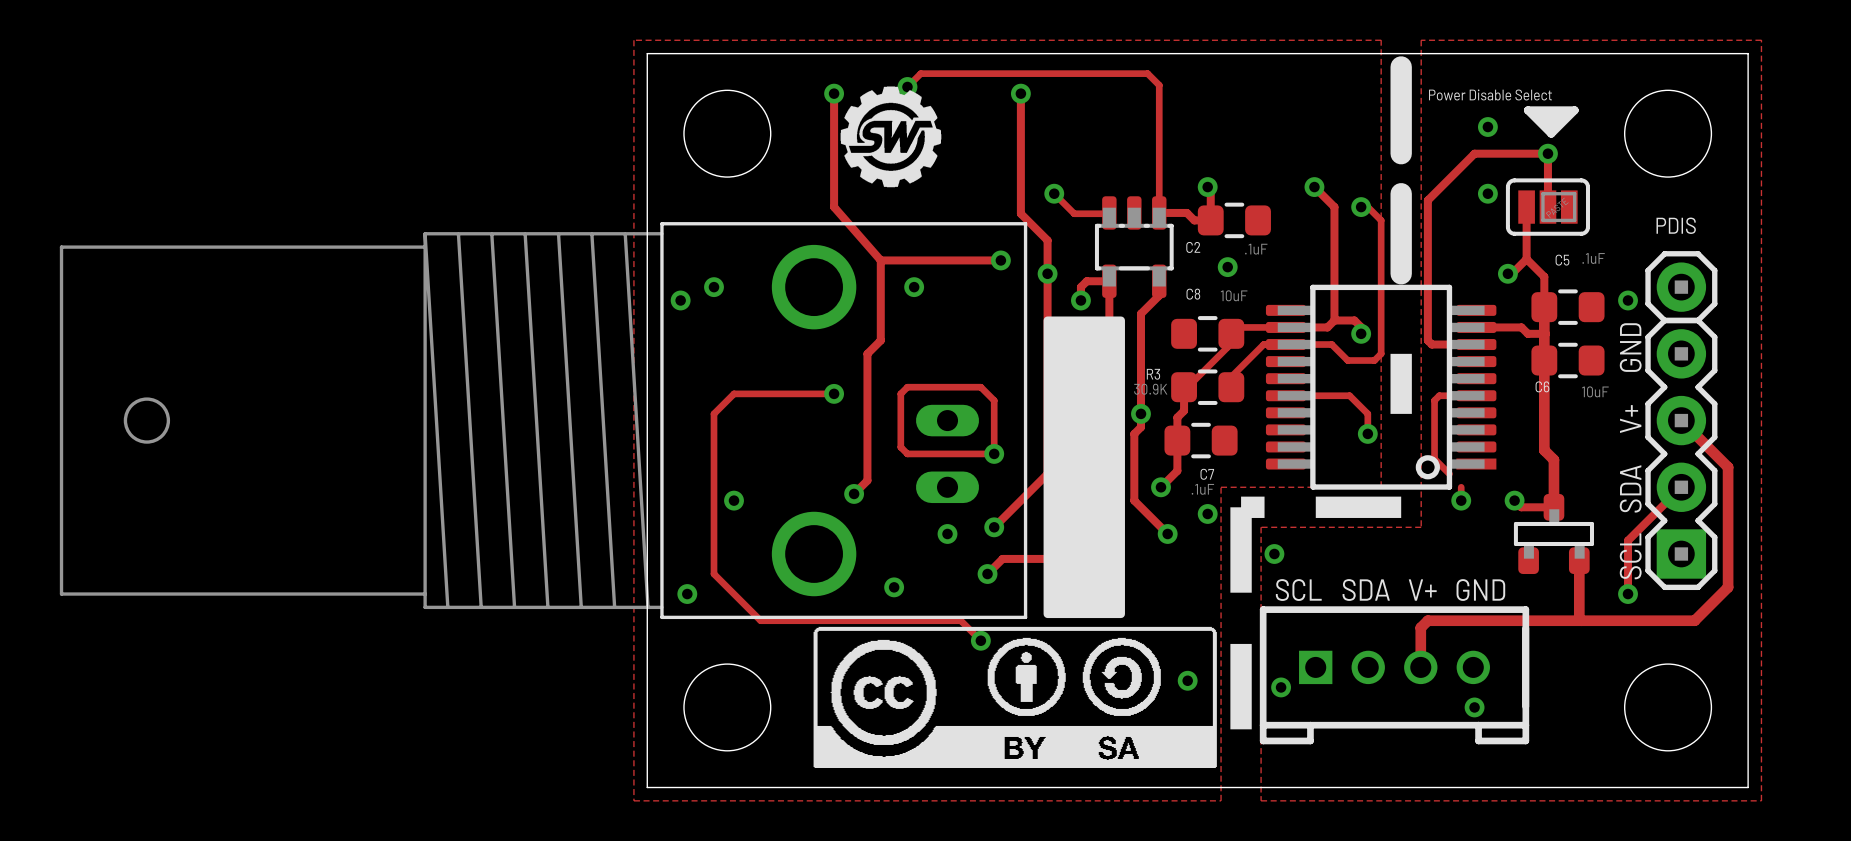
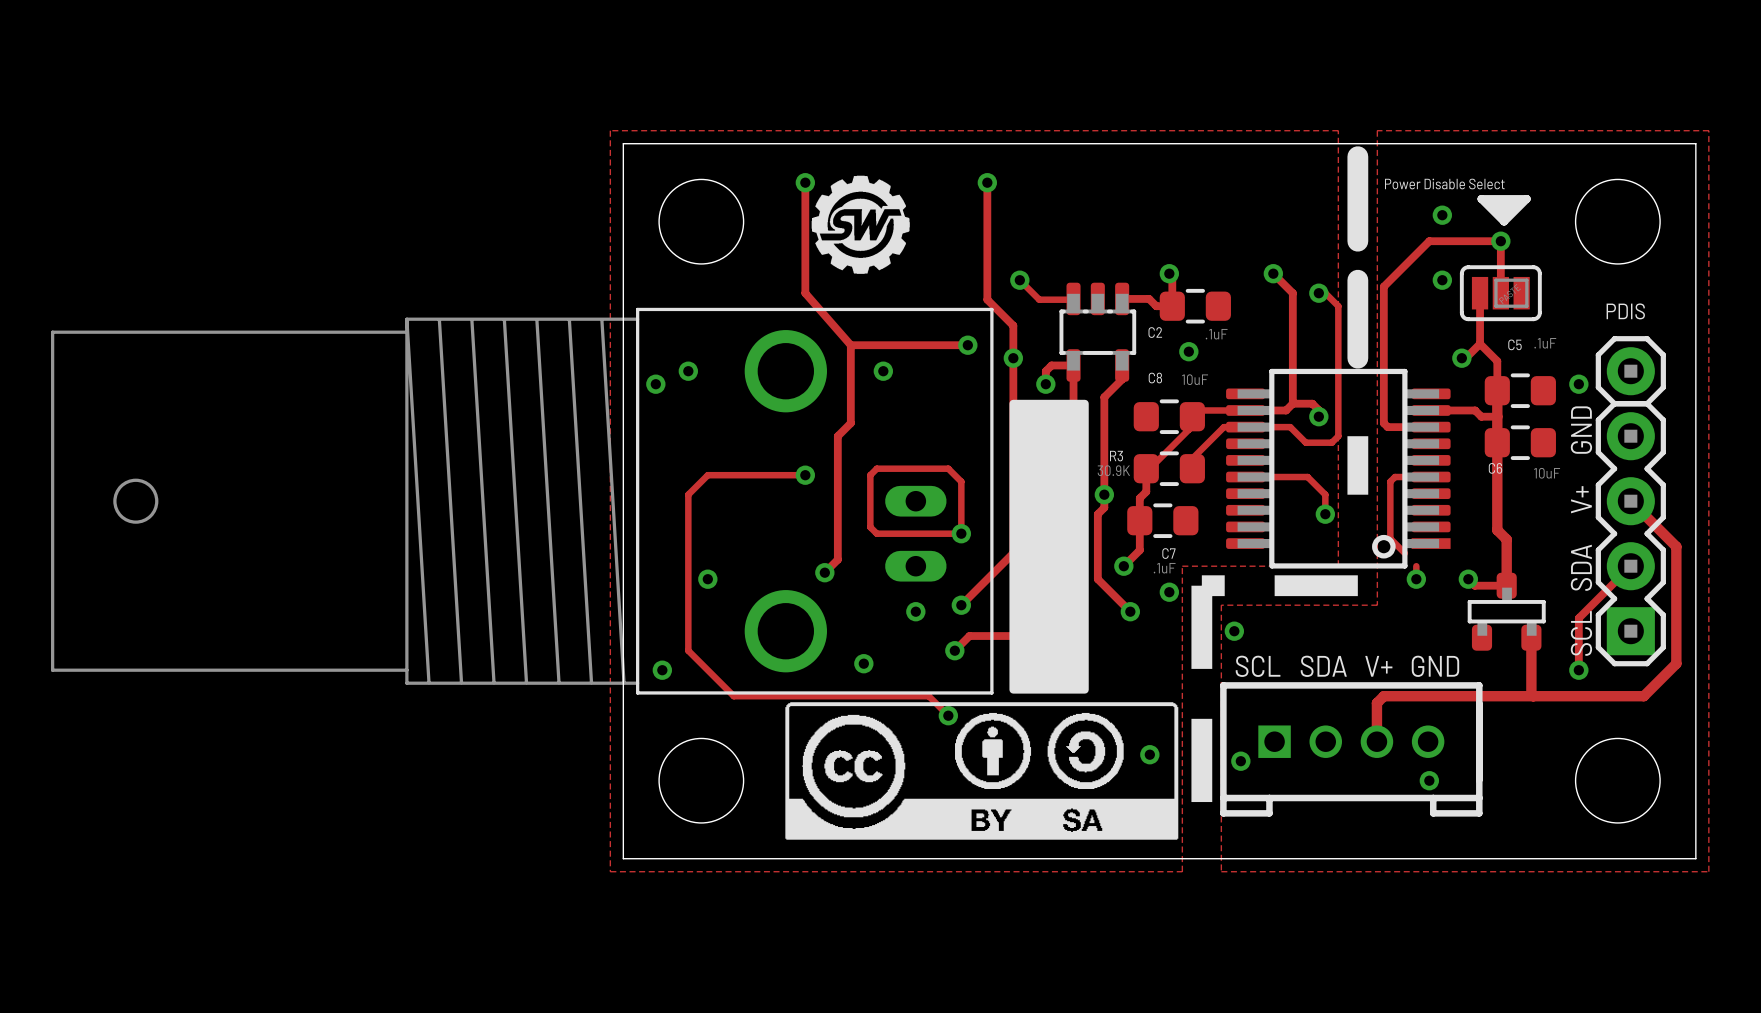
track: (907, 86) (920, 73) (1147, 73) (1159, 85) (1159, 212) -> none
via: (907, 86) -> none

